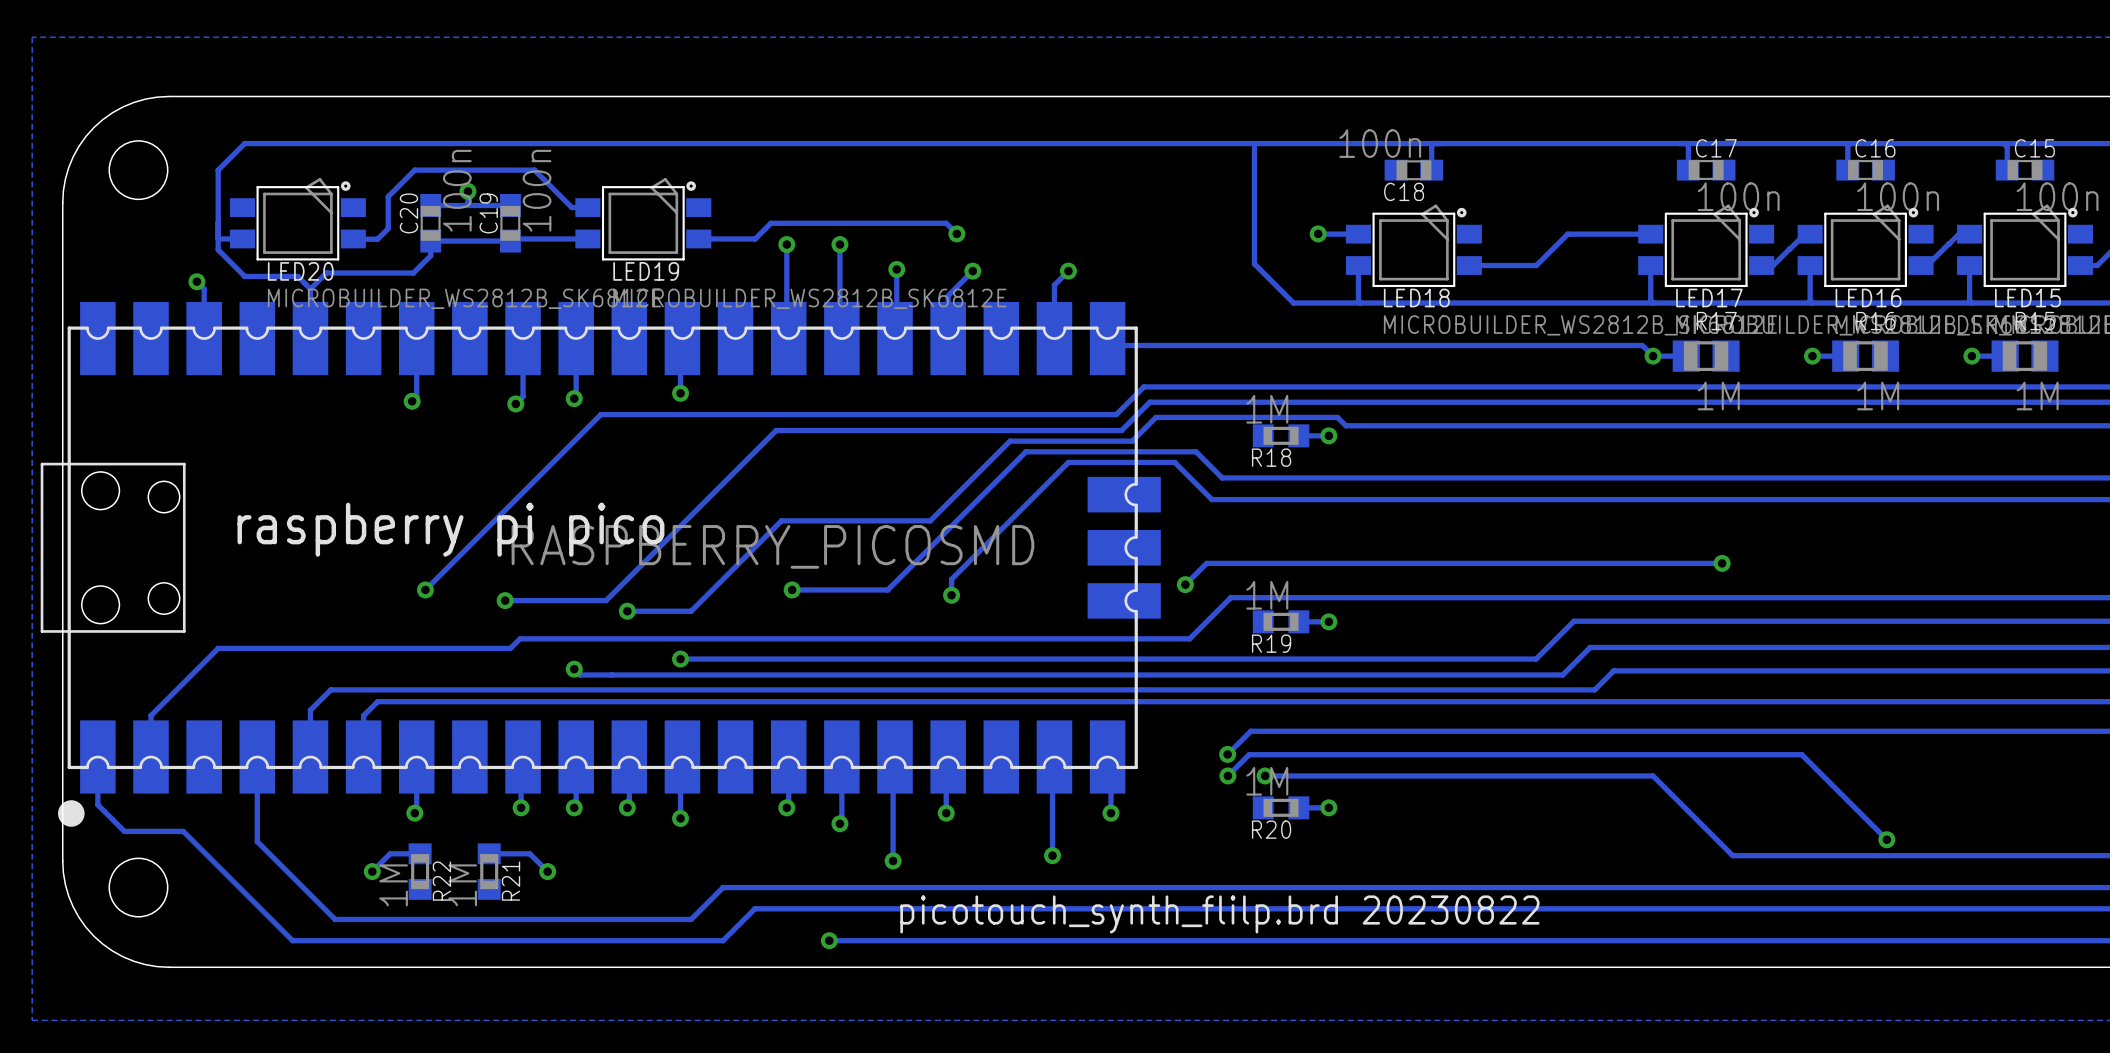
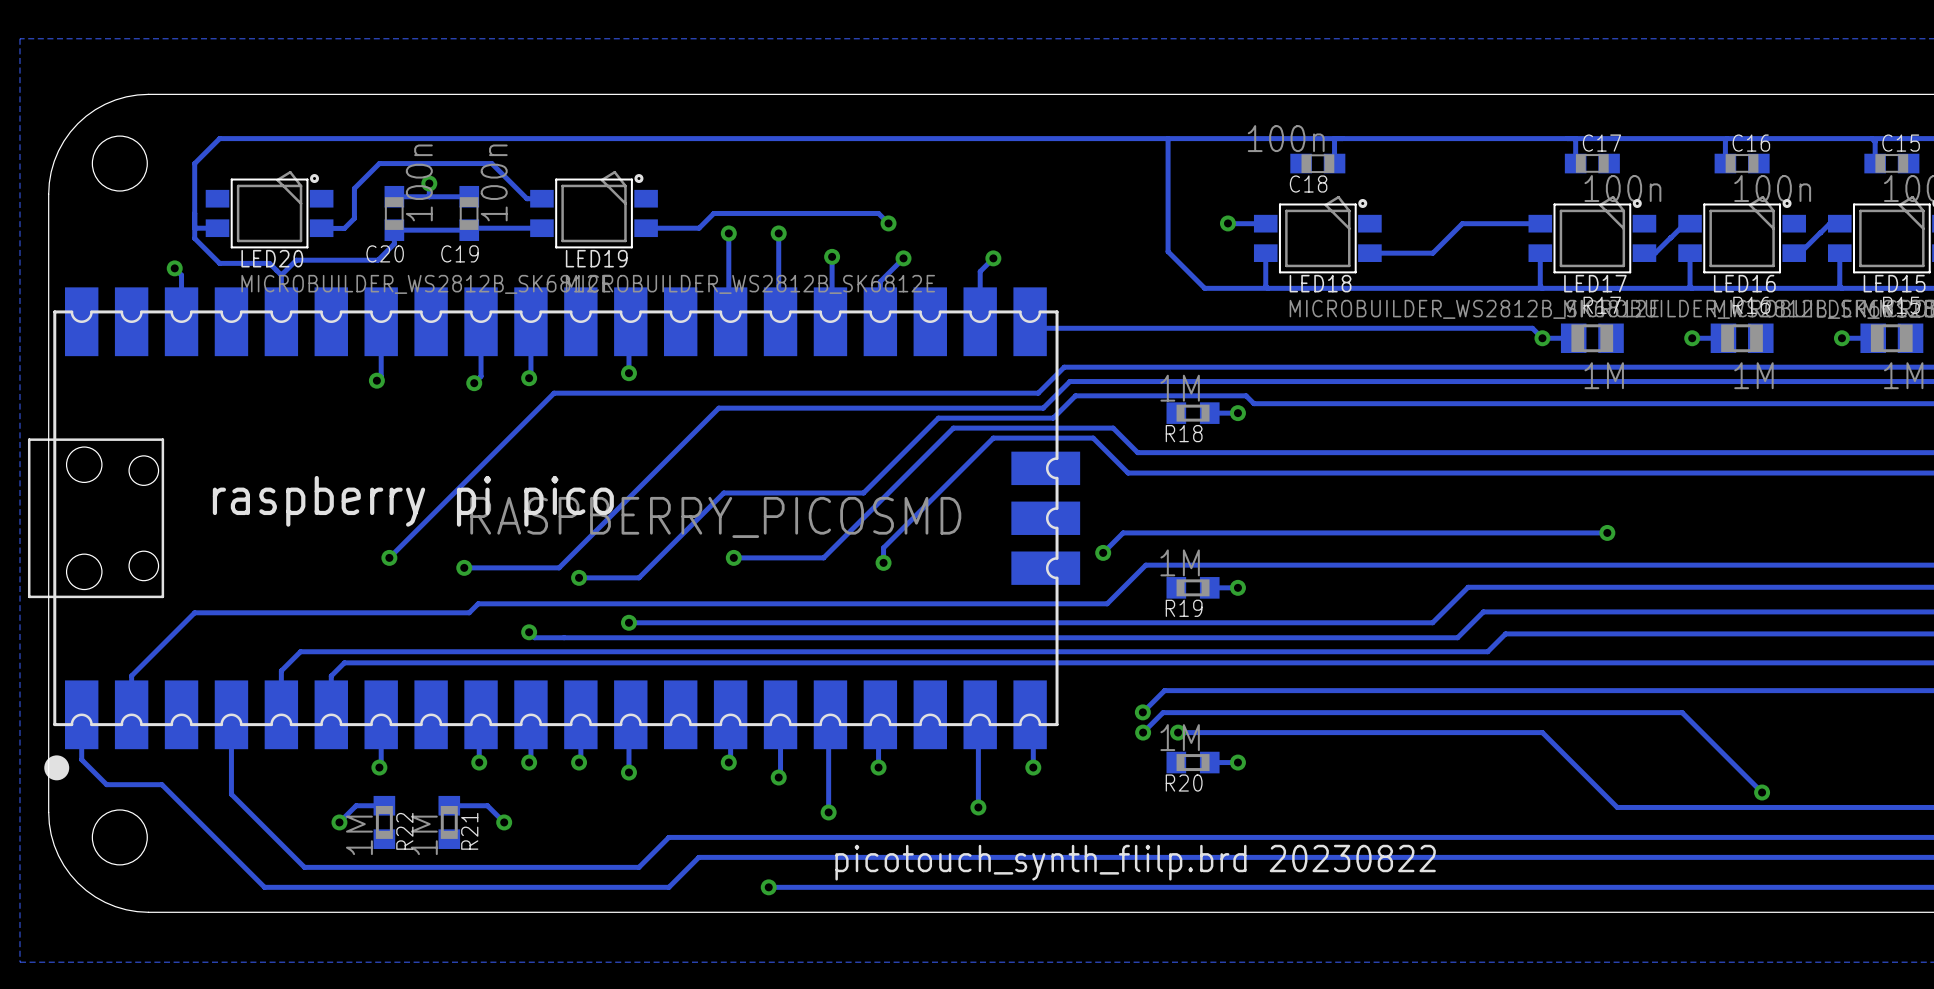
C20 name rotation: 0° (408, 213) -> 90° clockwise (385, 253)
C20 name position: C20 (408, 213) -> C20 (385, 253)
C19 name rotation: 0° (488, 213) -> 90° clockwise (460, 253)
C19 name position: C19 (488, 213) -> C19 (460, 253)

